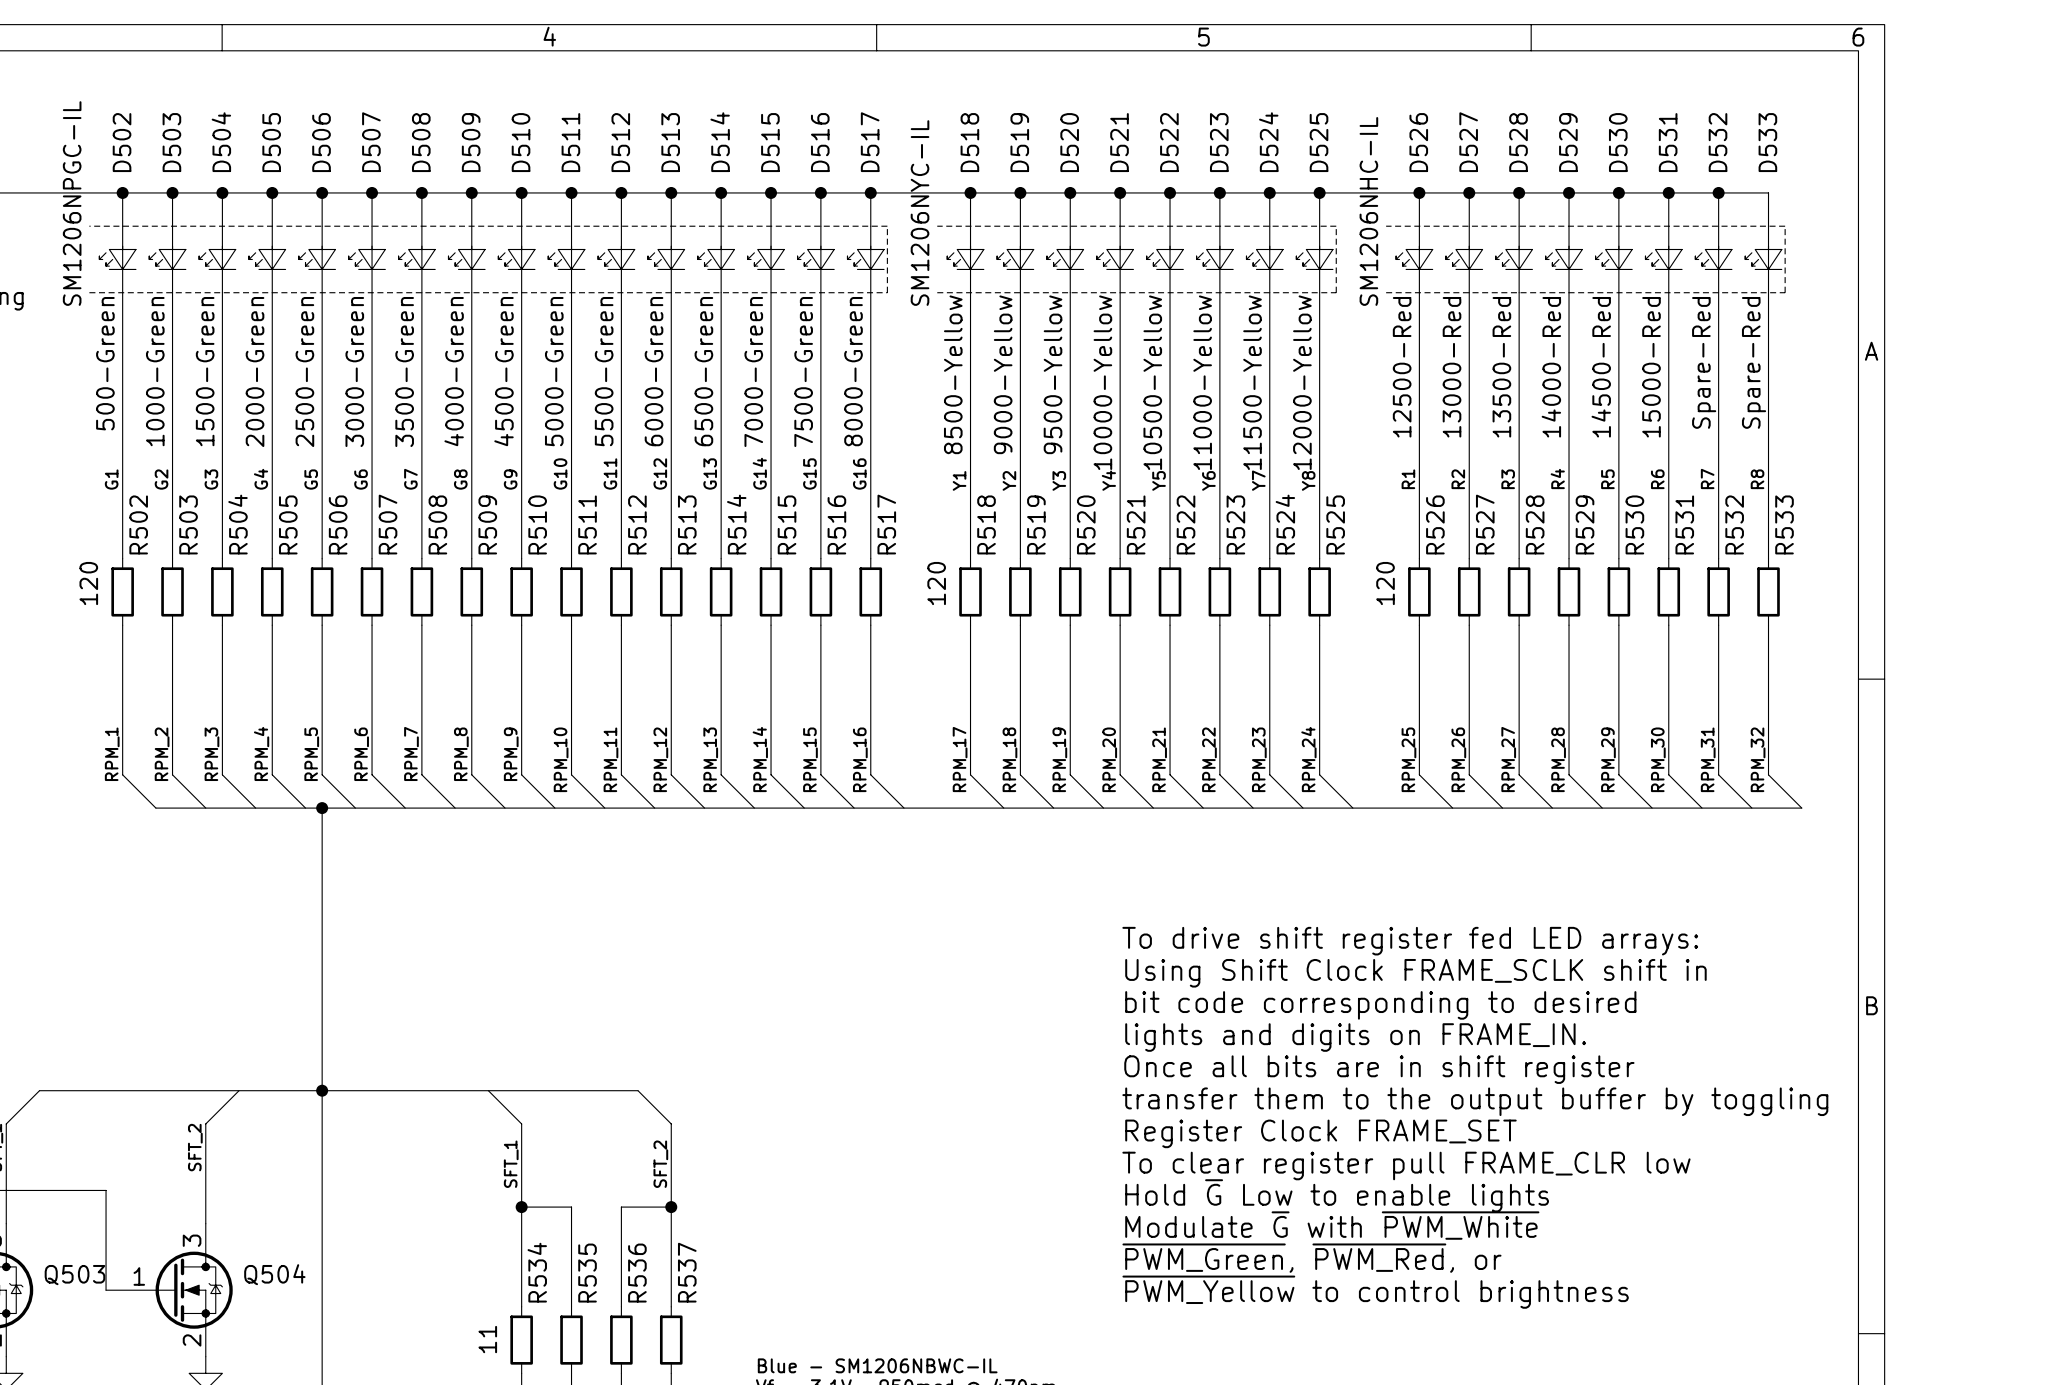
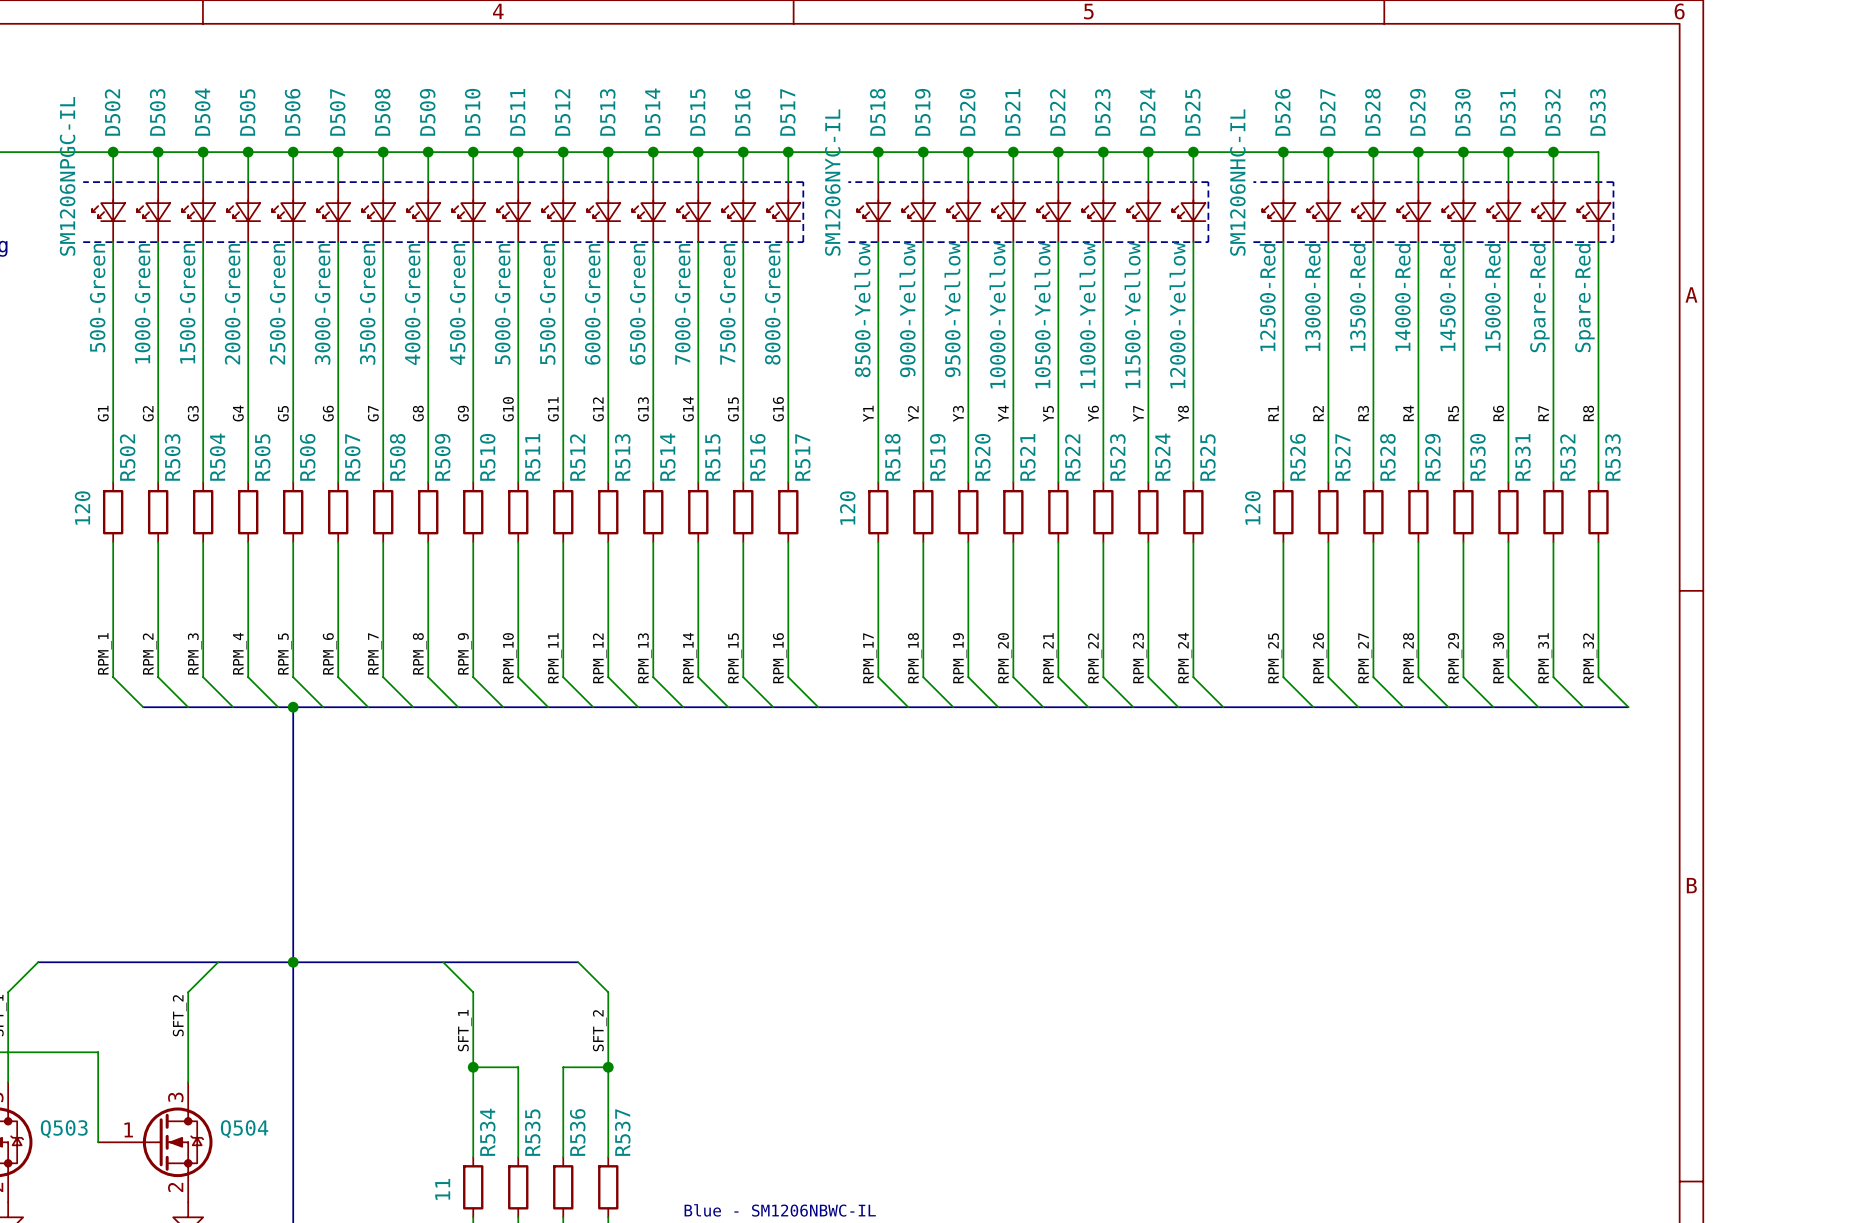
text: To drive shift register fed LED arrays: (1410, 941) -> none
text: Using Shift Clock FRAME_SCLK shift in (1415, 973) -> none
text: bit code corresponding to desired (1380, 1005) -> none
text: lights and digits on FRAME_IN. (1355, 1037) -> none
text: Once all bits are in shift register (1379, 1069) -> none
text: transfer them to the output buffer by toggling (1475, 1101) -> none
text: Register Clock FRAME_SET (1320, 1133) -> none
text: To clear register pull FRAME_CLR low (1406, 1165) -> none
text: Hold ~{G} Low to enable lights (1337, 1195) -> none
text: Modulate ~{G} with ~{PWM_White} (1332, 1225) -> none
text: ~{PWM_Green}, ~{PWM_Red}, or (1311, 1258) -> none
text: ~{PWM_Yellow} to control brightness (1375, 1292) -> none

